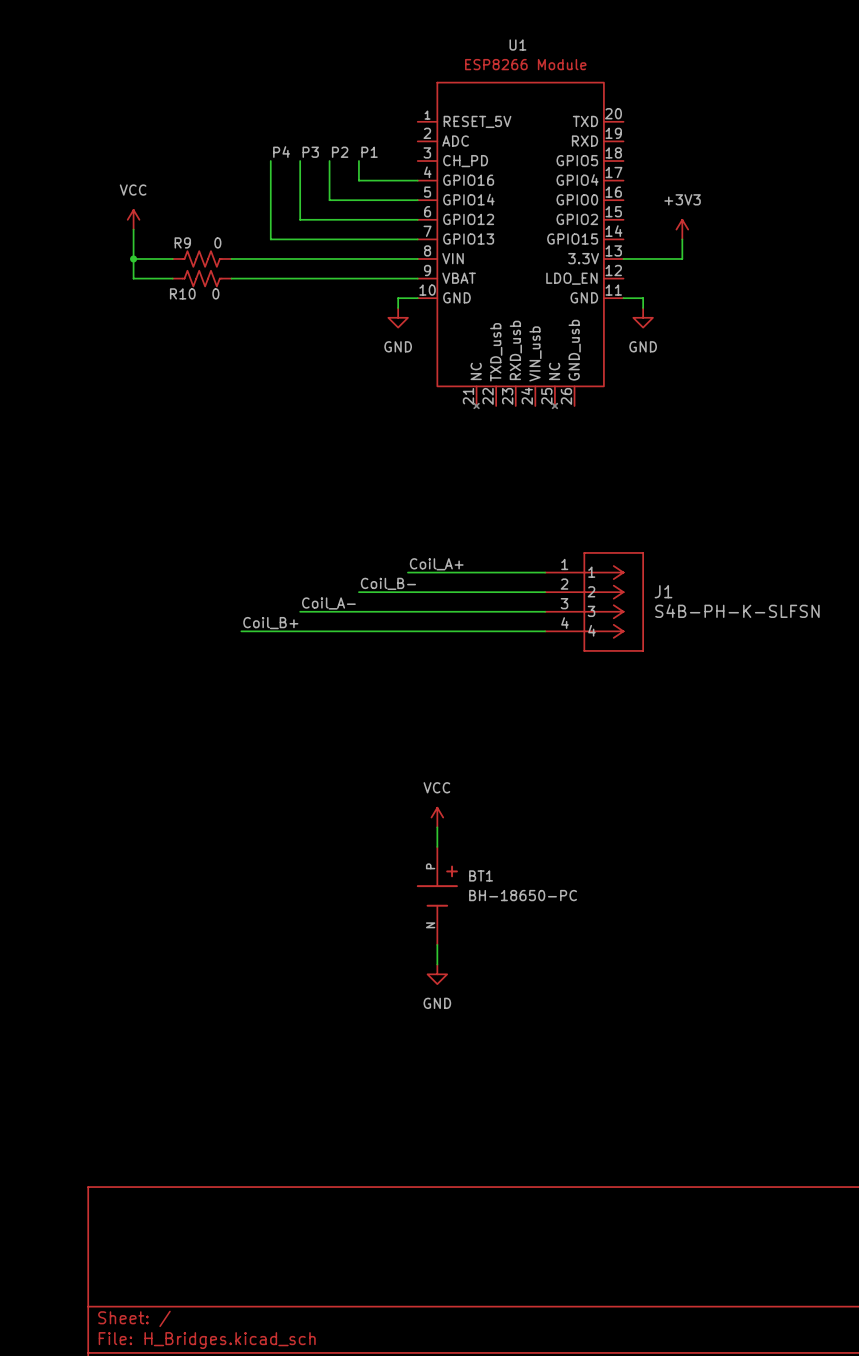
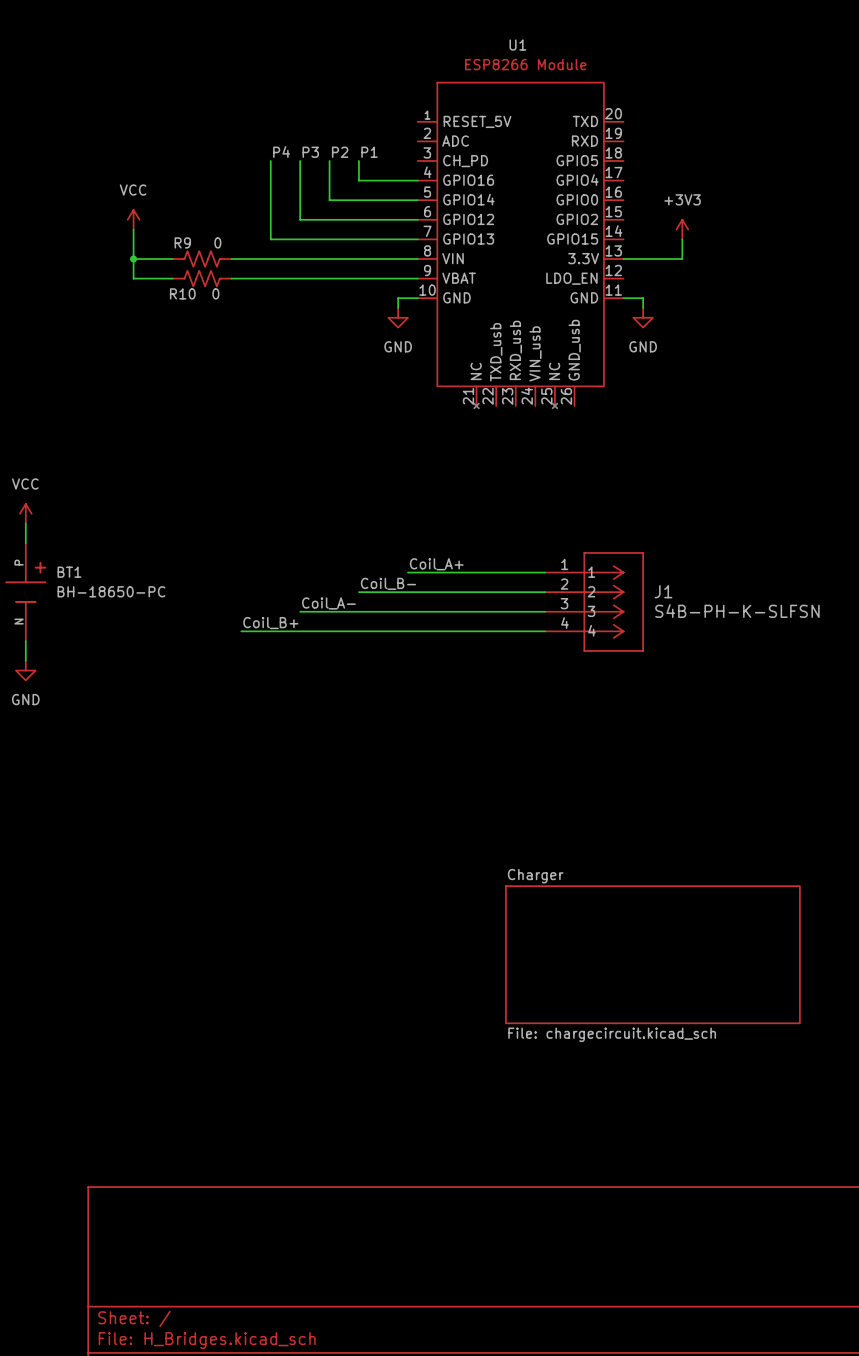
power symbol: none -> VCC (25, 513)
wire: none -> (25, 523) (25, 543)
wire: none -> (25, 641) (25, 660)
power symbol: none -> GND (25, 670)
power symbol: VCC (437, 817) -> none
wire: (437, 827) (437, 846) -> none
BT1 position: (437, 895) -> (25, 592)
wire: (437, 944) (437, 964) -> none
sheet Charger: none -> File: chargecircuit.kicad_sch (652, 954)
power symbol: GND (437, 974) -> none

